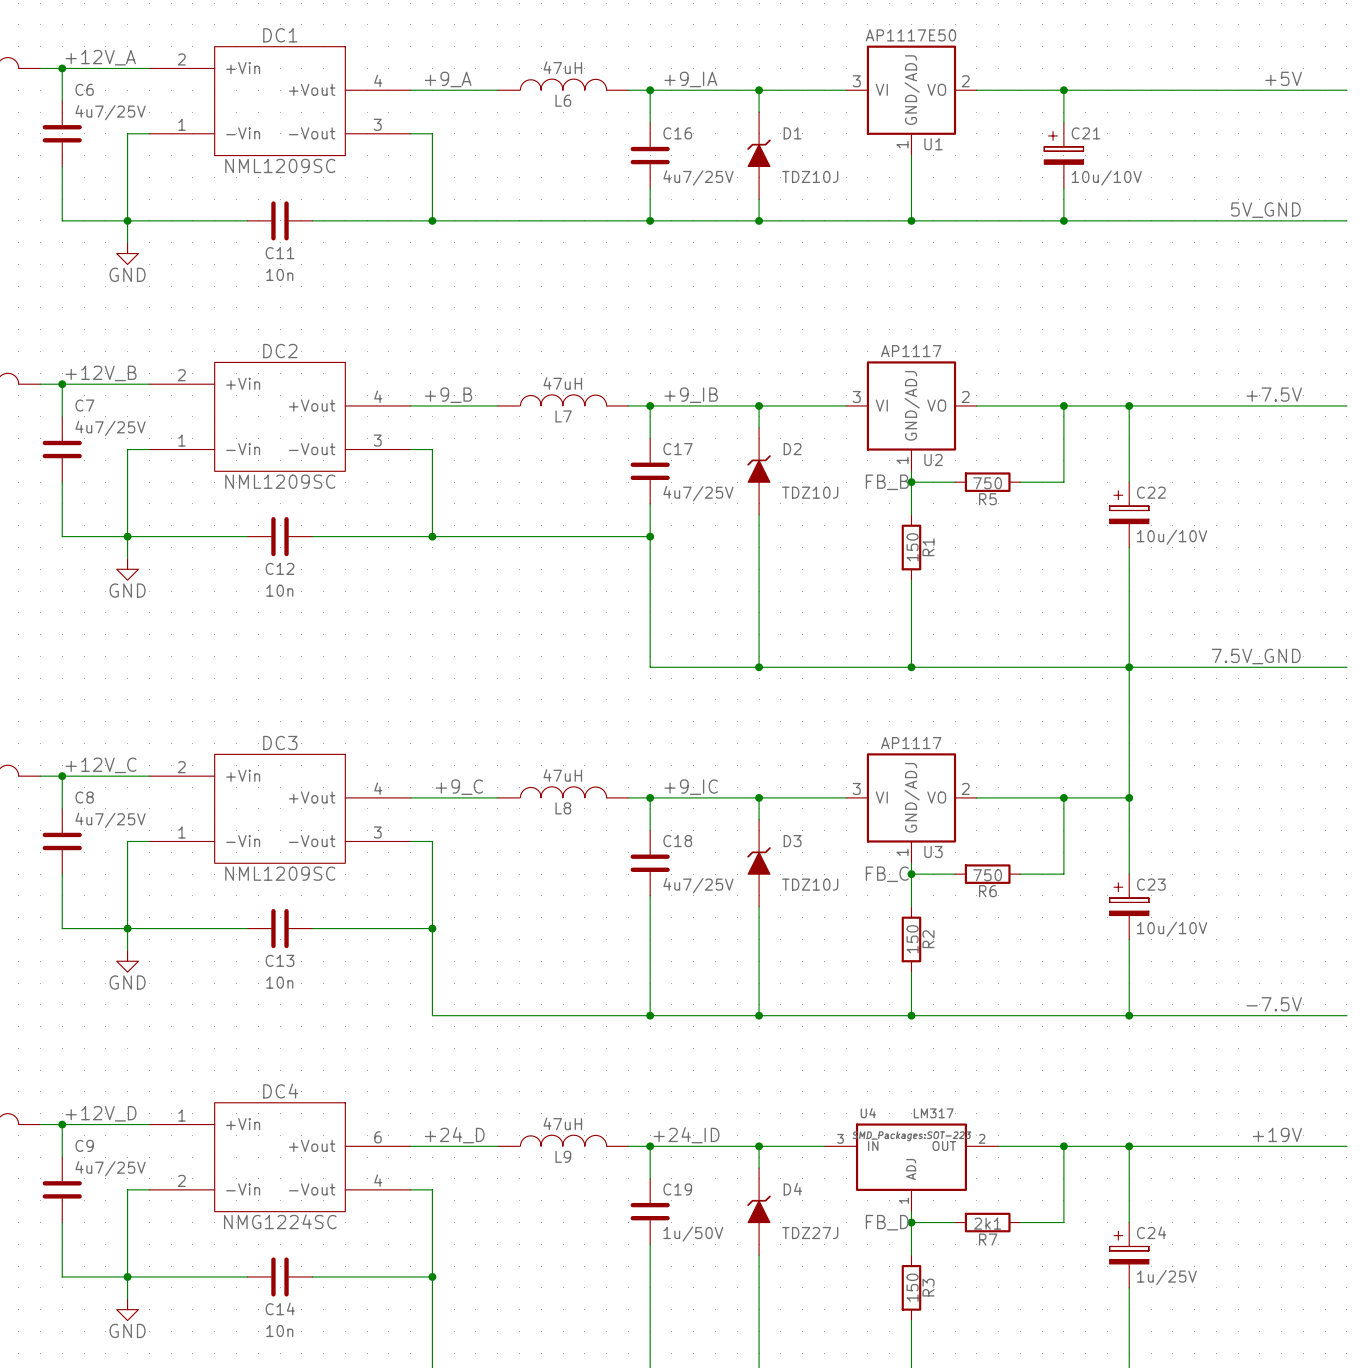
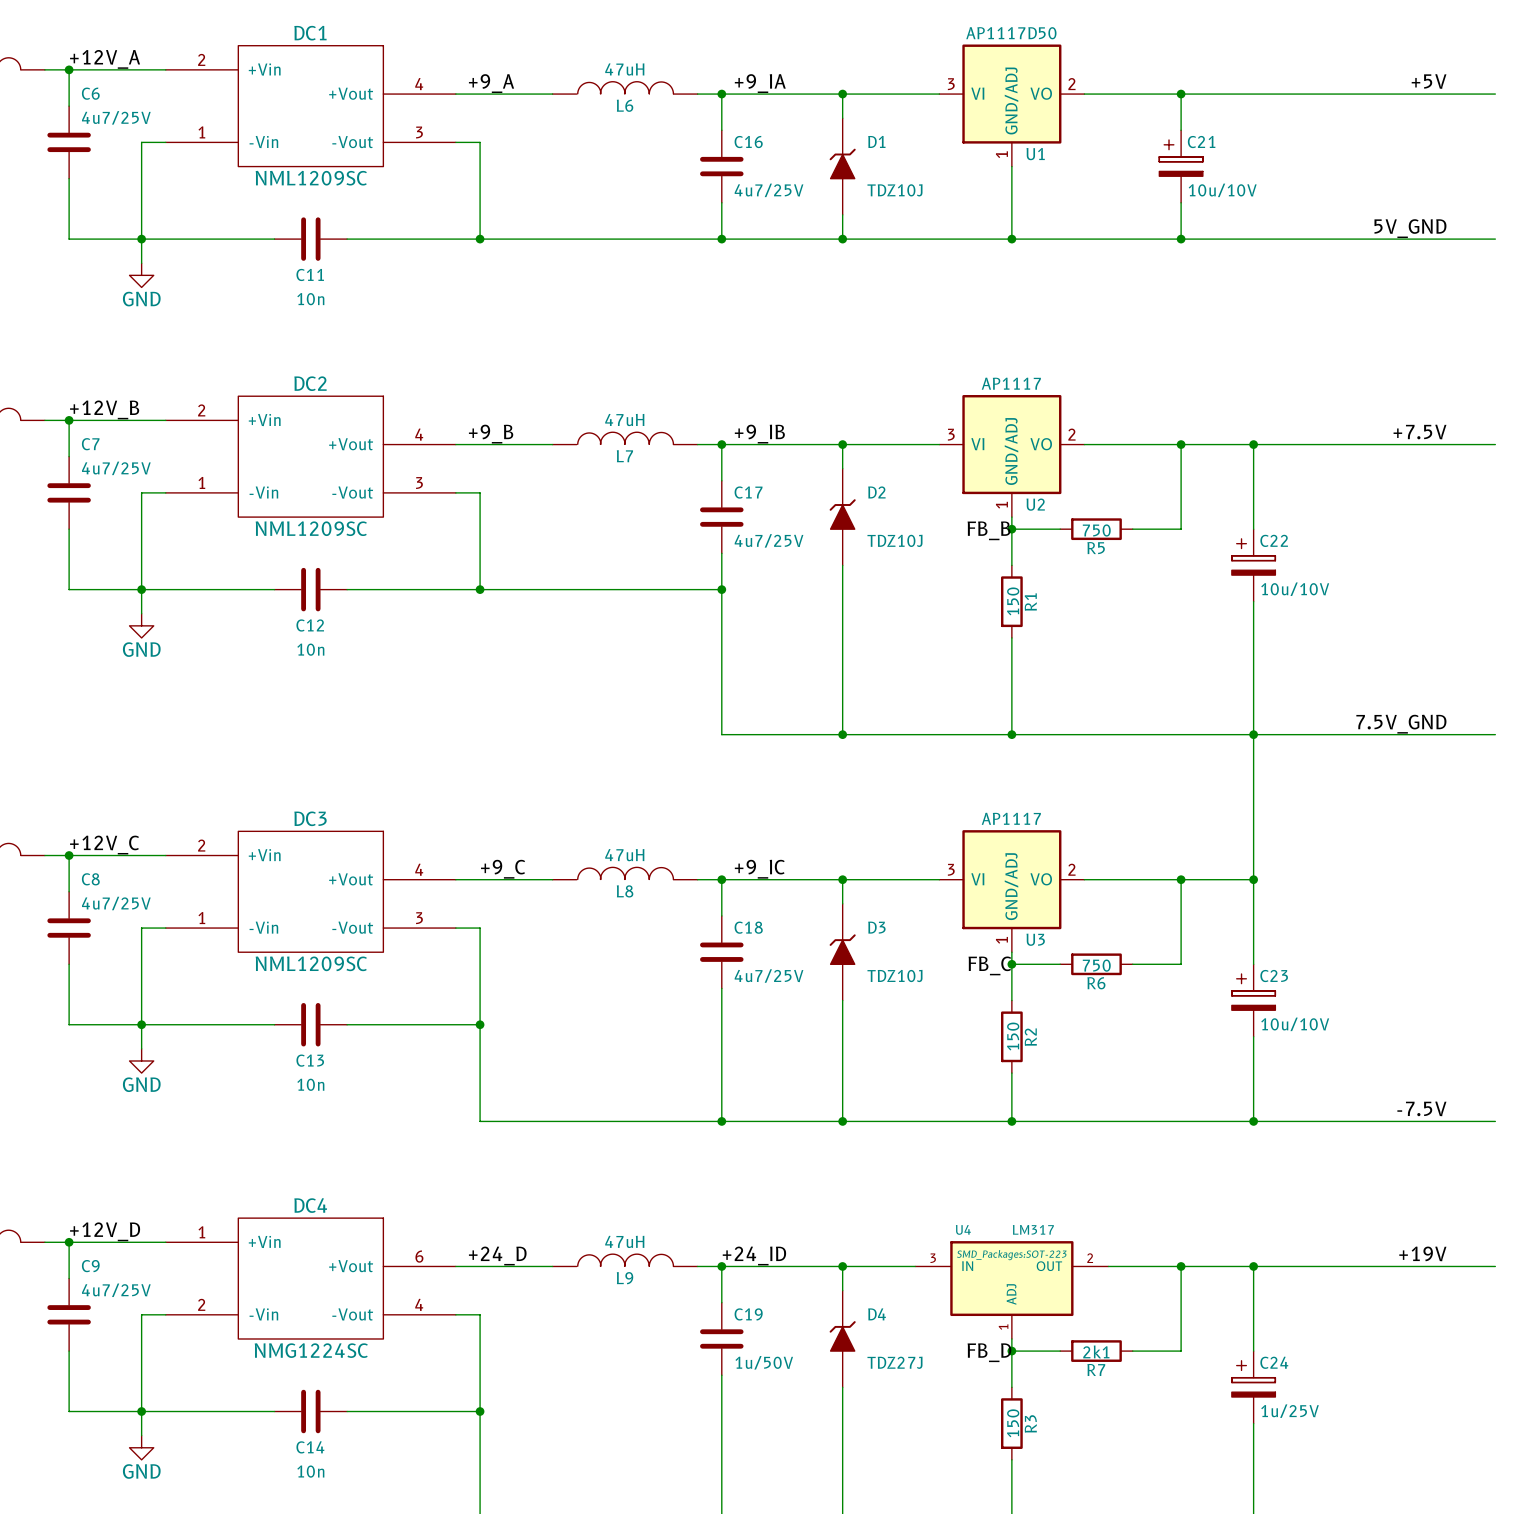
U1 value: AP1117E50 (910, 35) -> AP1117D50 (1011, 33)

